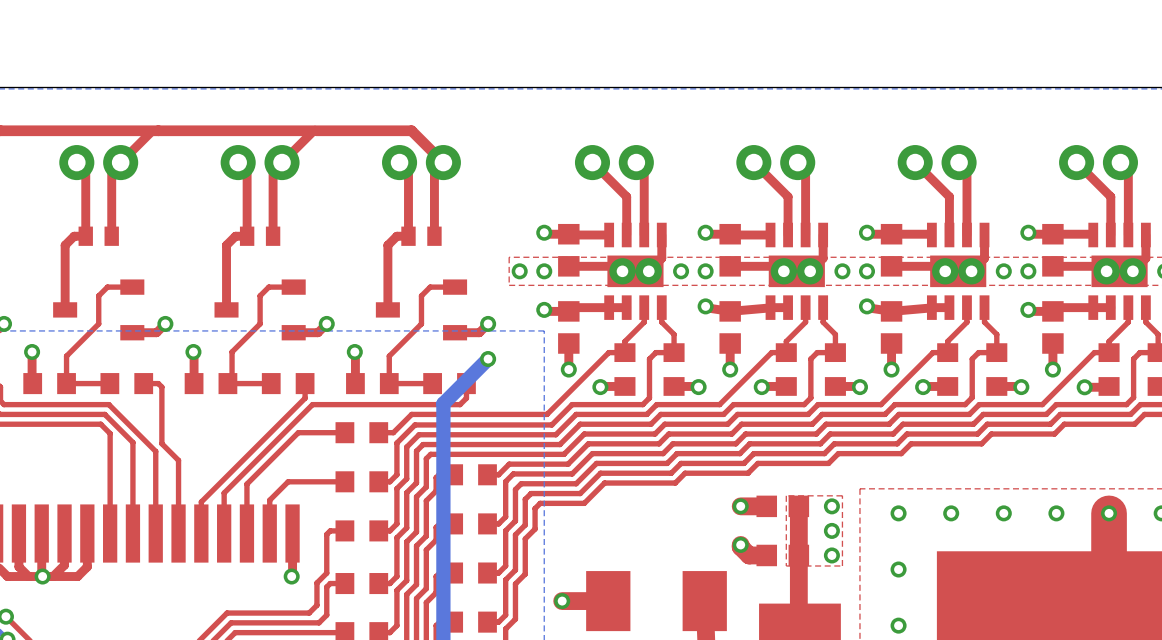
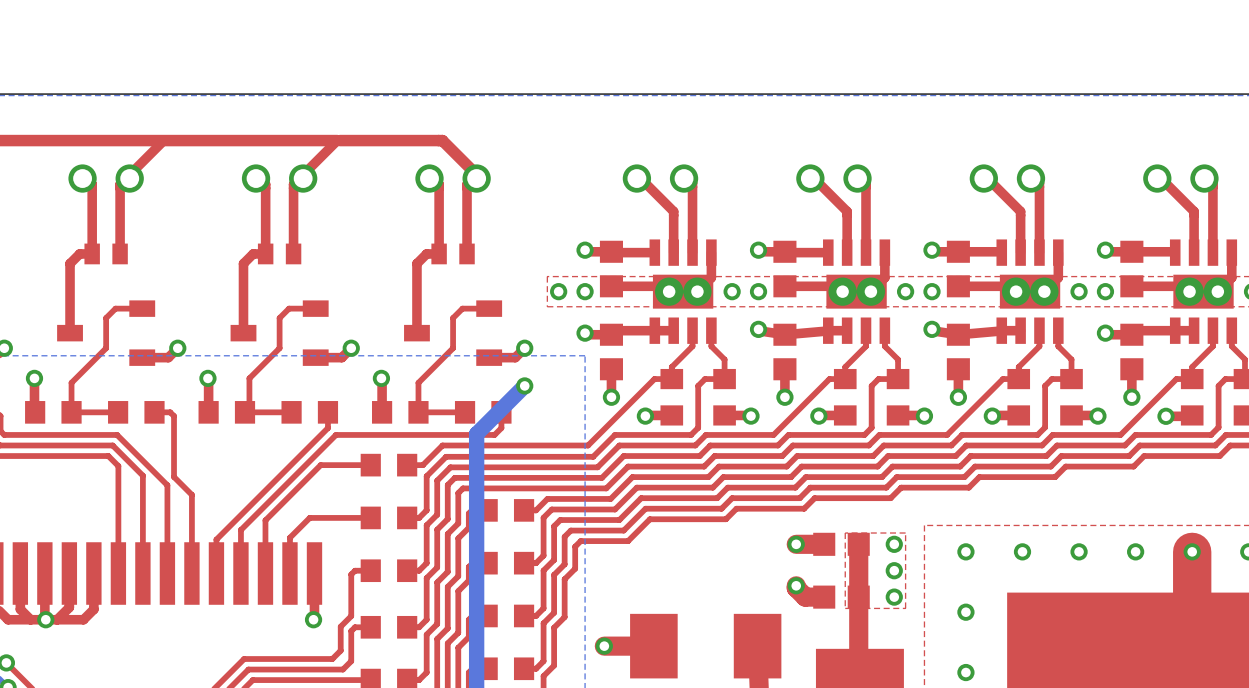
part footprint: [59, 145, 139, 181] -> [68, 164, 144, 193]
part footprint: [220, 145, 300, 181] -> [241, 164, 318, 193]
part footprint: [382, 145, 461, 181] -> [415, 164, 491, 193]
part footprint: [574, 145, 654, 181] -> [622, 164, 699, 193]
part footprint: [736, 145, 816, 181] -> [796, 164, 872, 193]
part footprint: [897, 145, 977, 181] -> [969, 164, 1046, 193]
part footprint: [1059, 145, 1138, 181] -> [1143, 164, 1219, 193]

